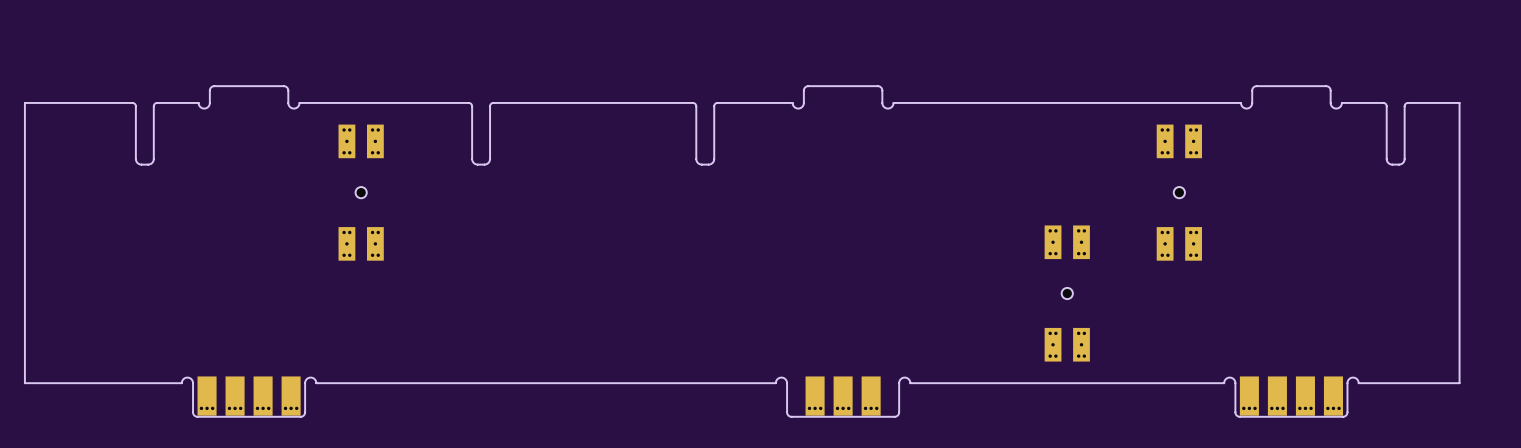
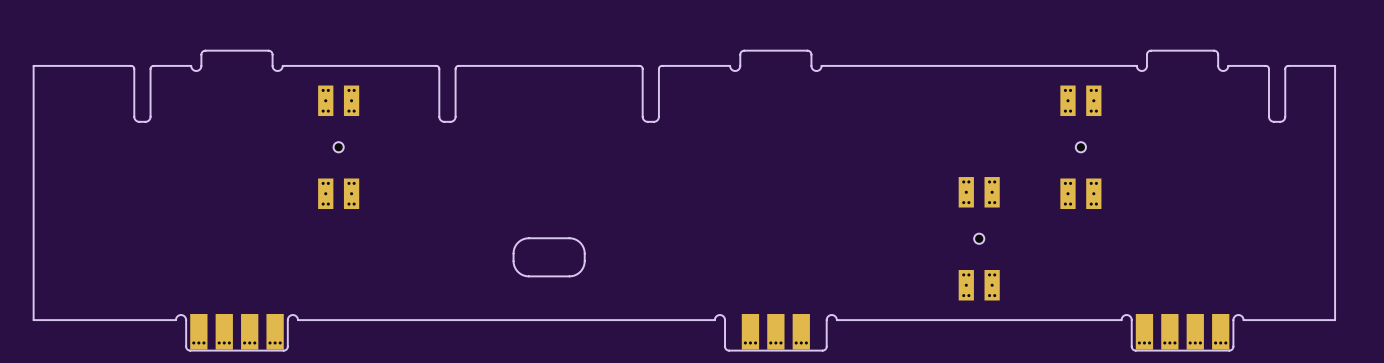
drawing: none -> [513, 237, 586, 277]

